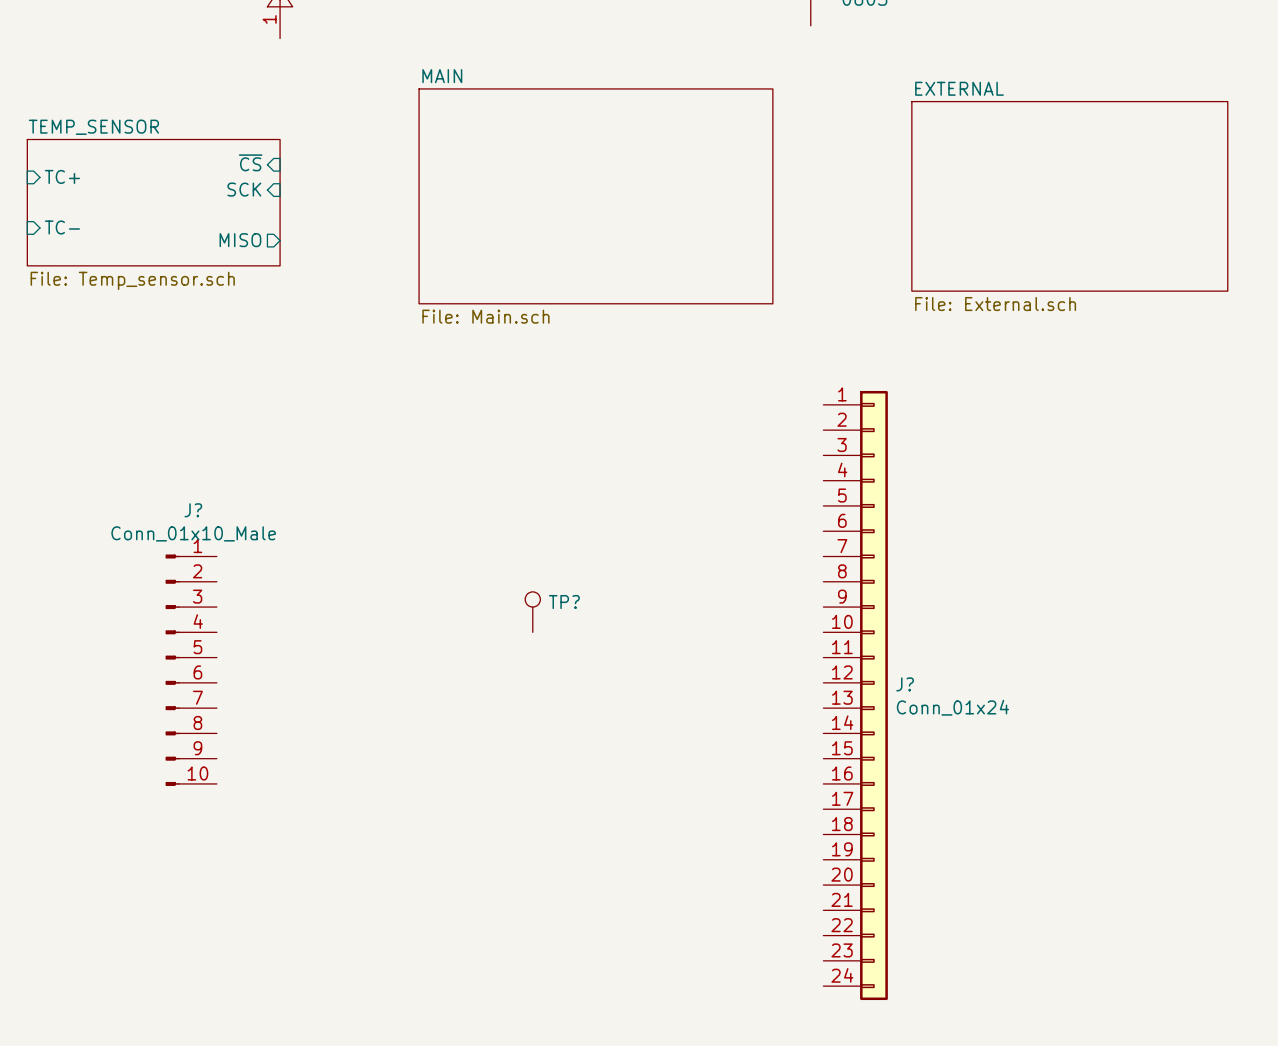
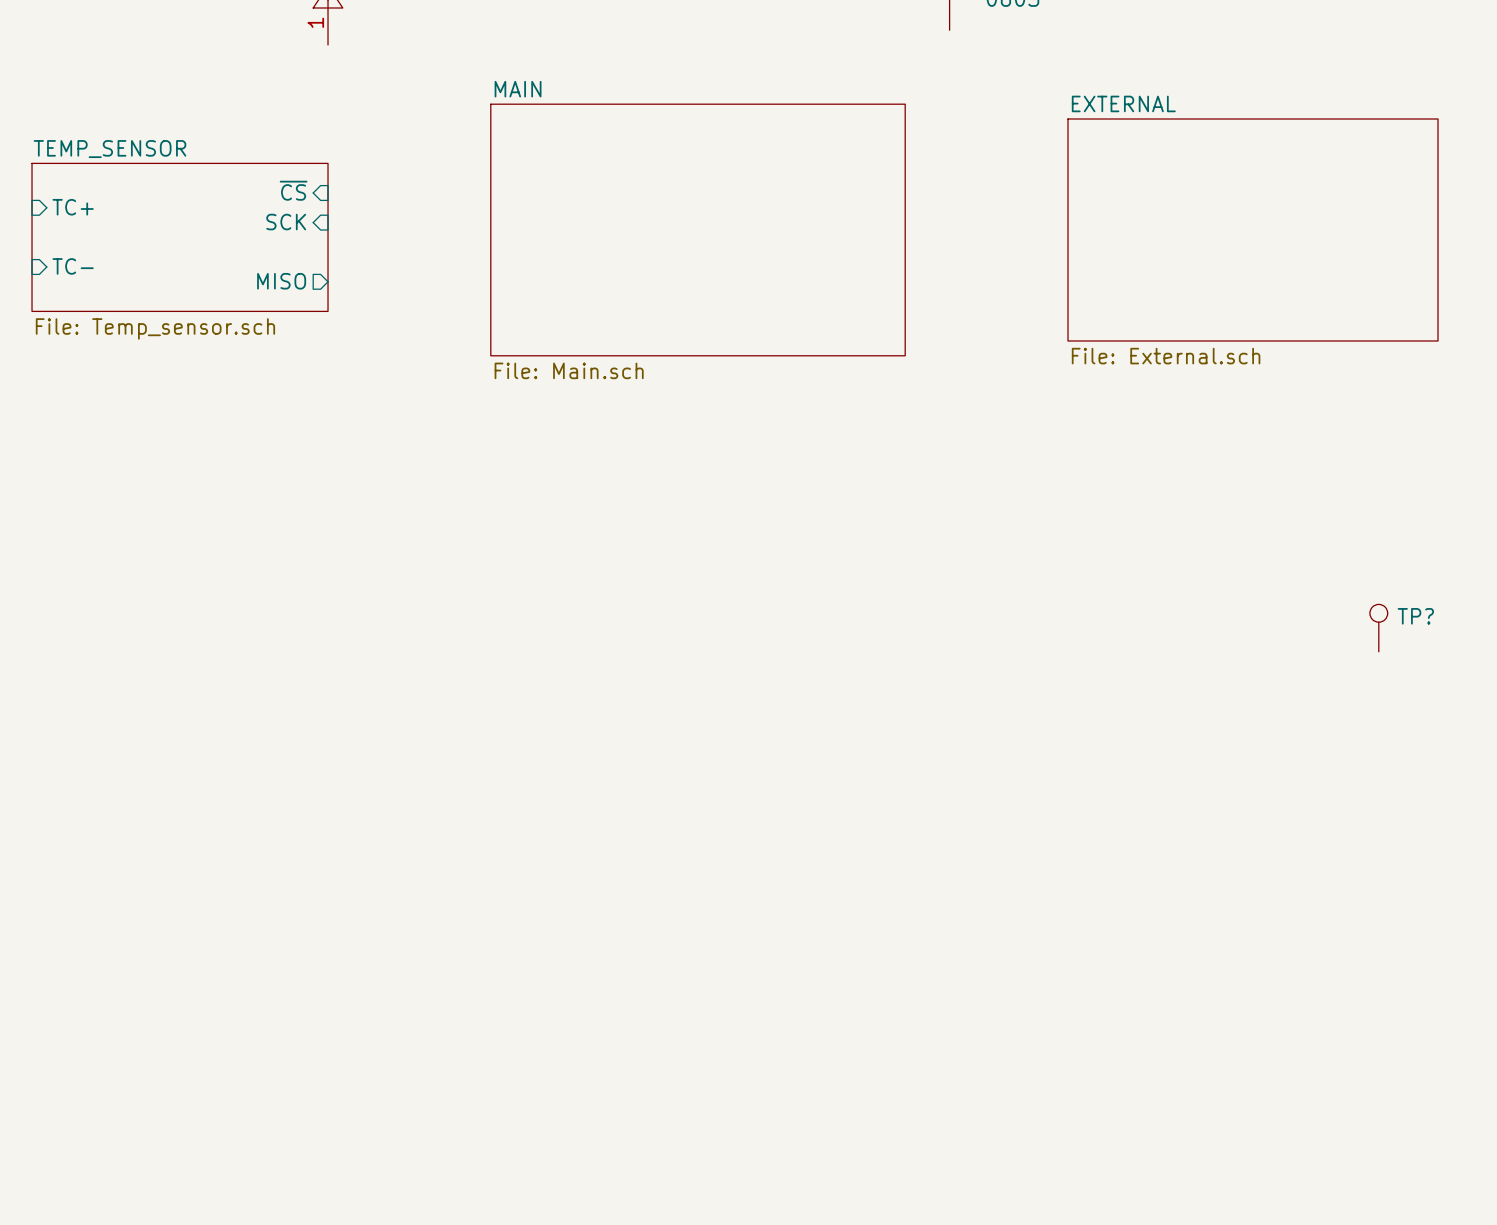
TP?: none -> (1378, 628)
TP?: (532, 612) -> none
J?: Conn_01x10_Male (191, 670) -> none
J?: Conn_01x24 (855, 695) -> none

